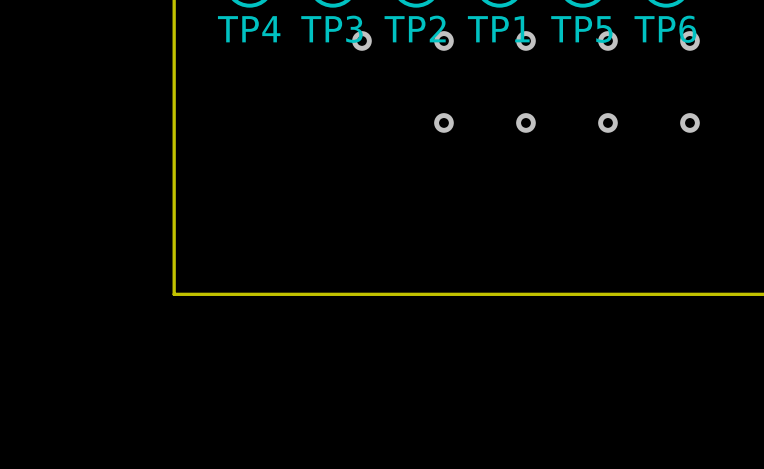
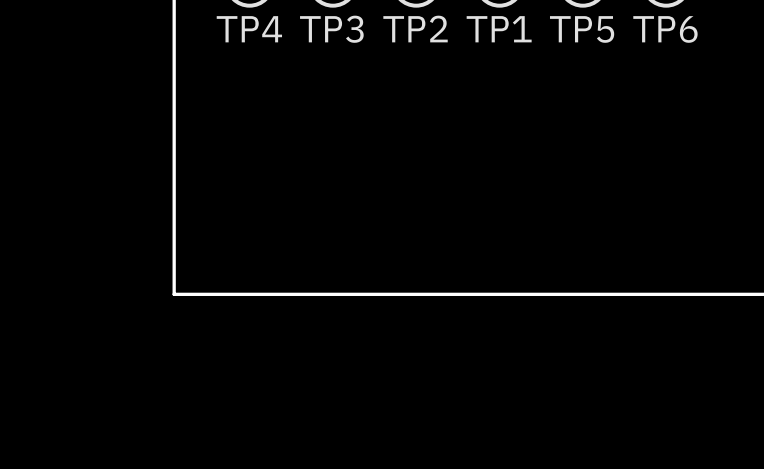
via: (361, 40) -> none
via: (443, 40) -> none
via: (525, 40) -> none
via: (607, 40) -> none
via: (689, 40) -> none
via: (443, 122) -> none
via: (525, 122) -> none
via: (607, 122) -> none
via: (689, 122) -> none

